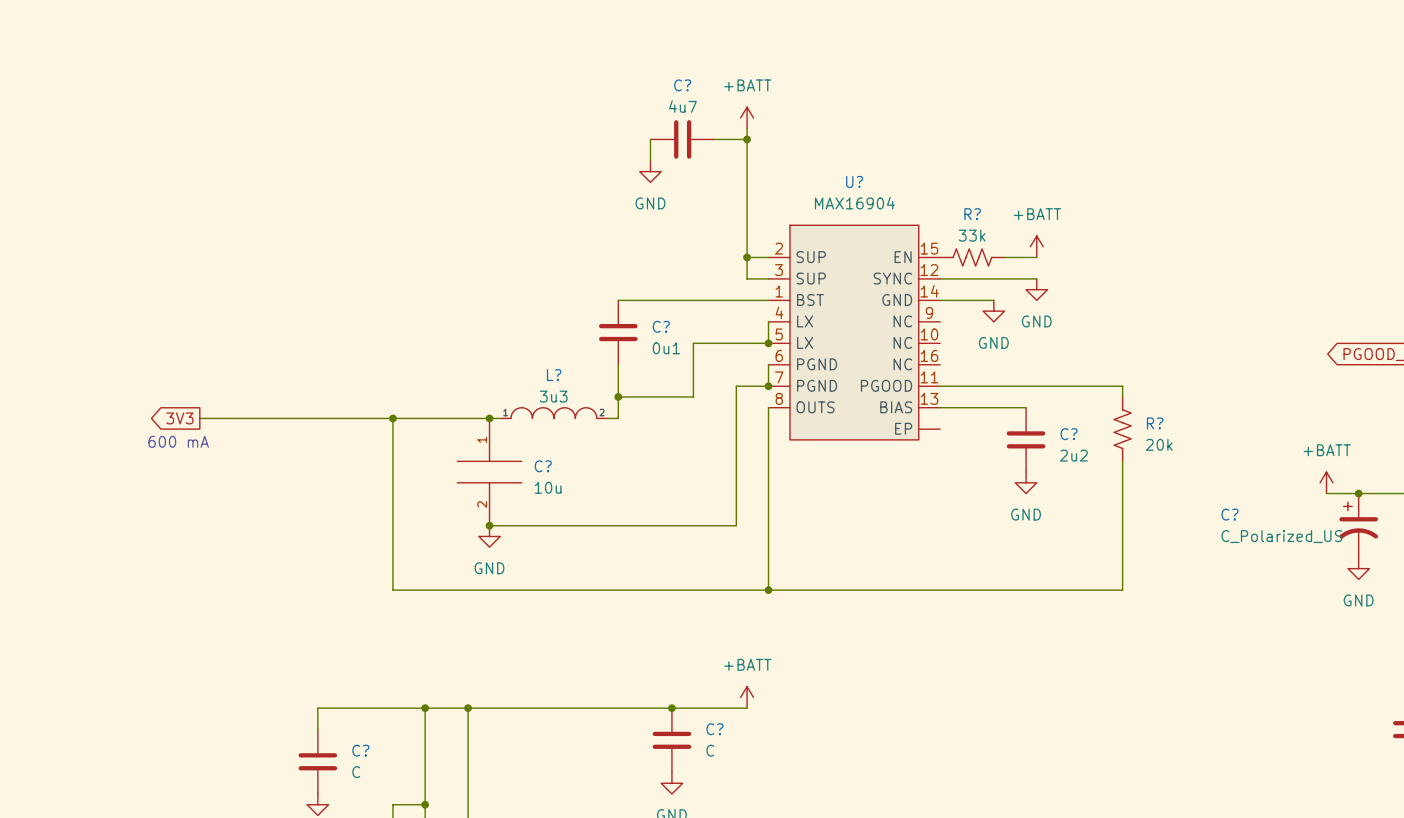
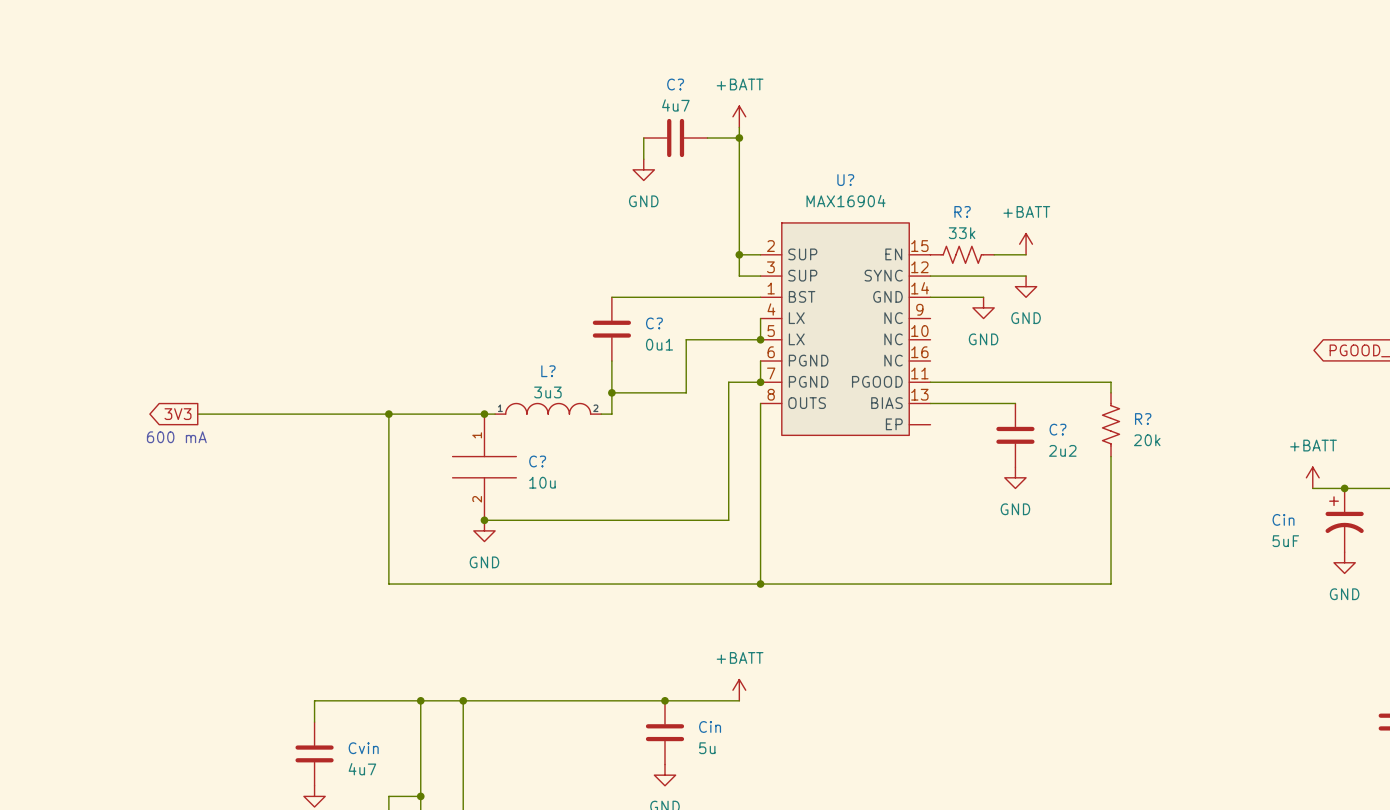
C? name: C? (1230, 514) -> Cin (1283, 519)
C? value: C_Polarized_US (1281, 536) -> 5uF (1285, 541)
C? name: C? (714, 729) -> Cin (710, 726)
C? name: C? (360, 750) -> Cvin (363, 748)
C? value: C (710, 750) -> 5u (707, 748)
C? value: C (356, 772) -> 4u7 (362, 769)

